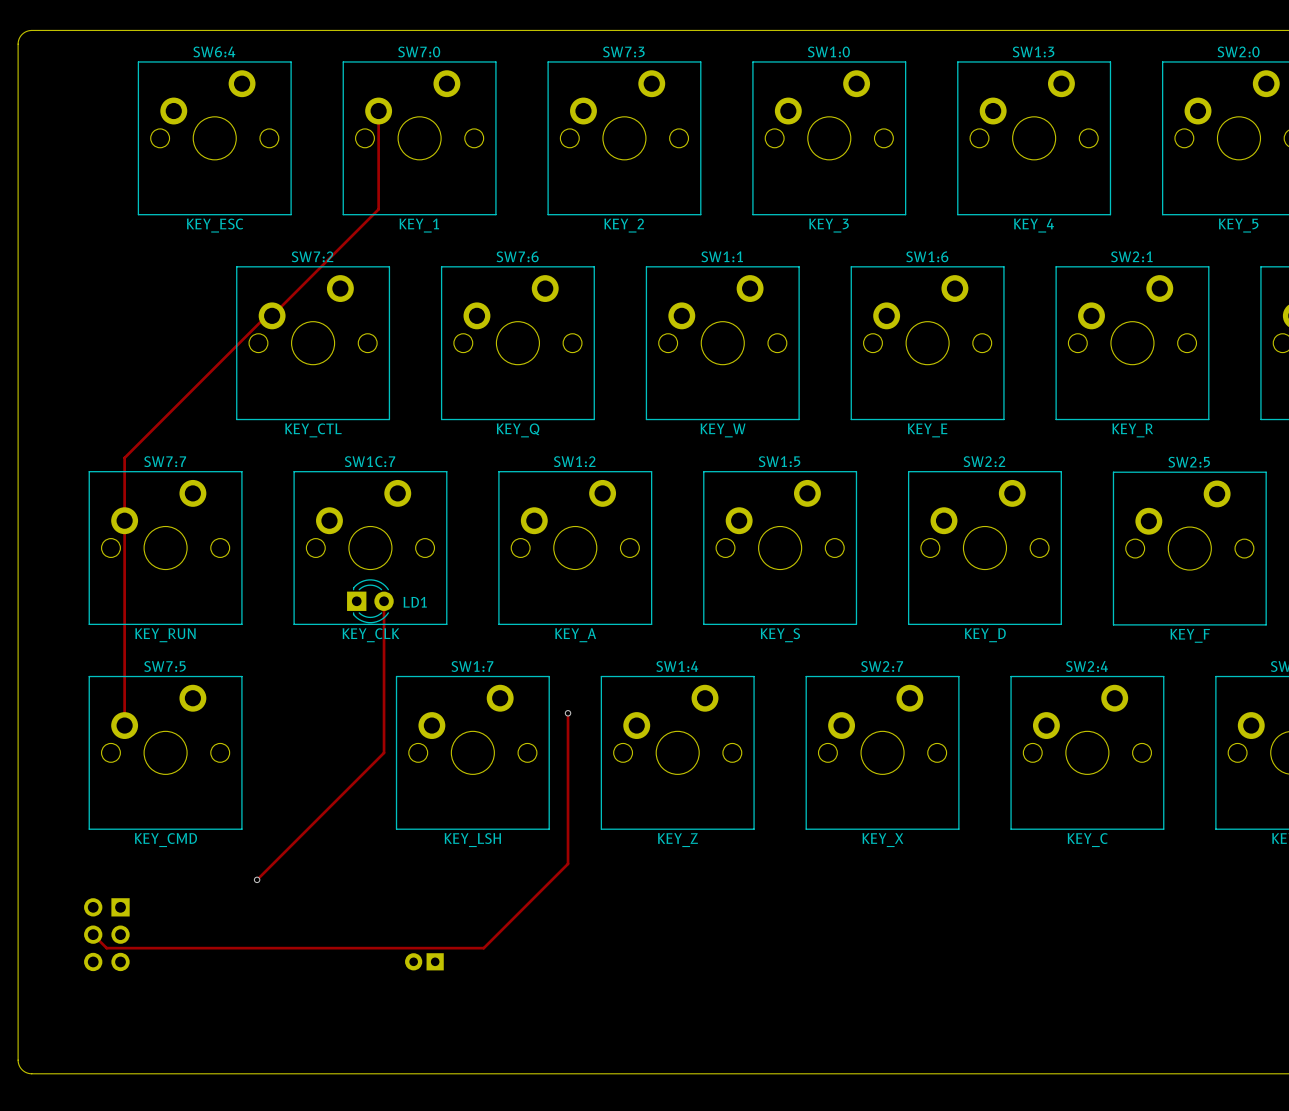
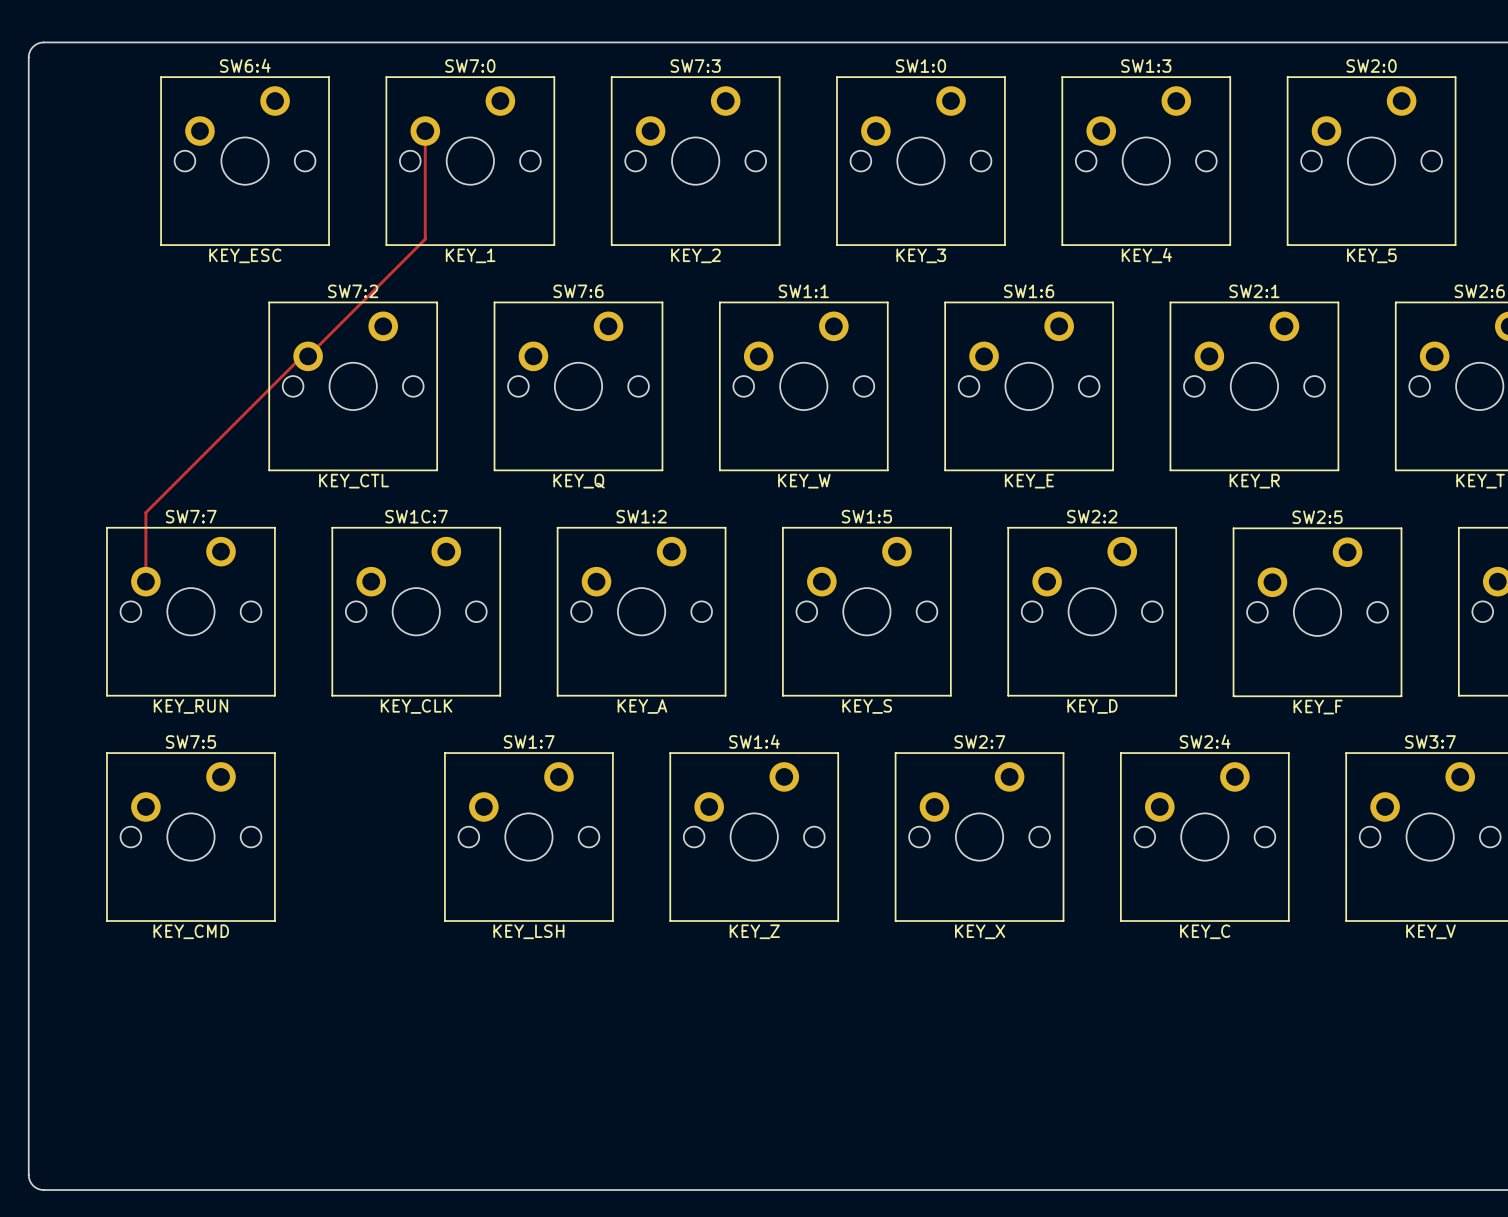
track: (124, 520) (124, 725) -> none
LD1: (370, 601) -> none
track: (384, 601) (384, 752) (257, 879) -> none
track: (568, 713) (568, 863) (483, 948) (106, 948) (93, 934) -> none
via: (568, 713) -> none
via: (257, 879) -> none
part: (106, 934) -> none
part: (424, 961) -> none

